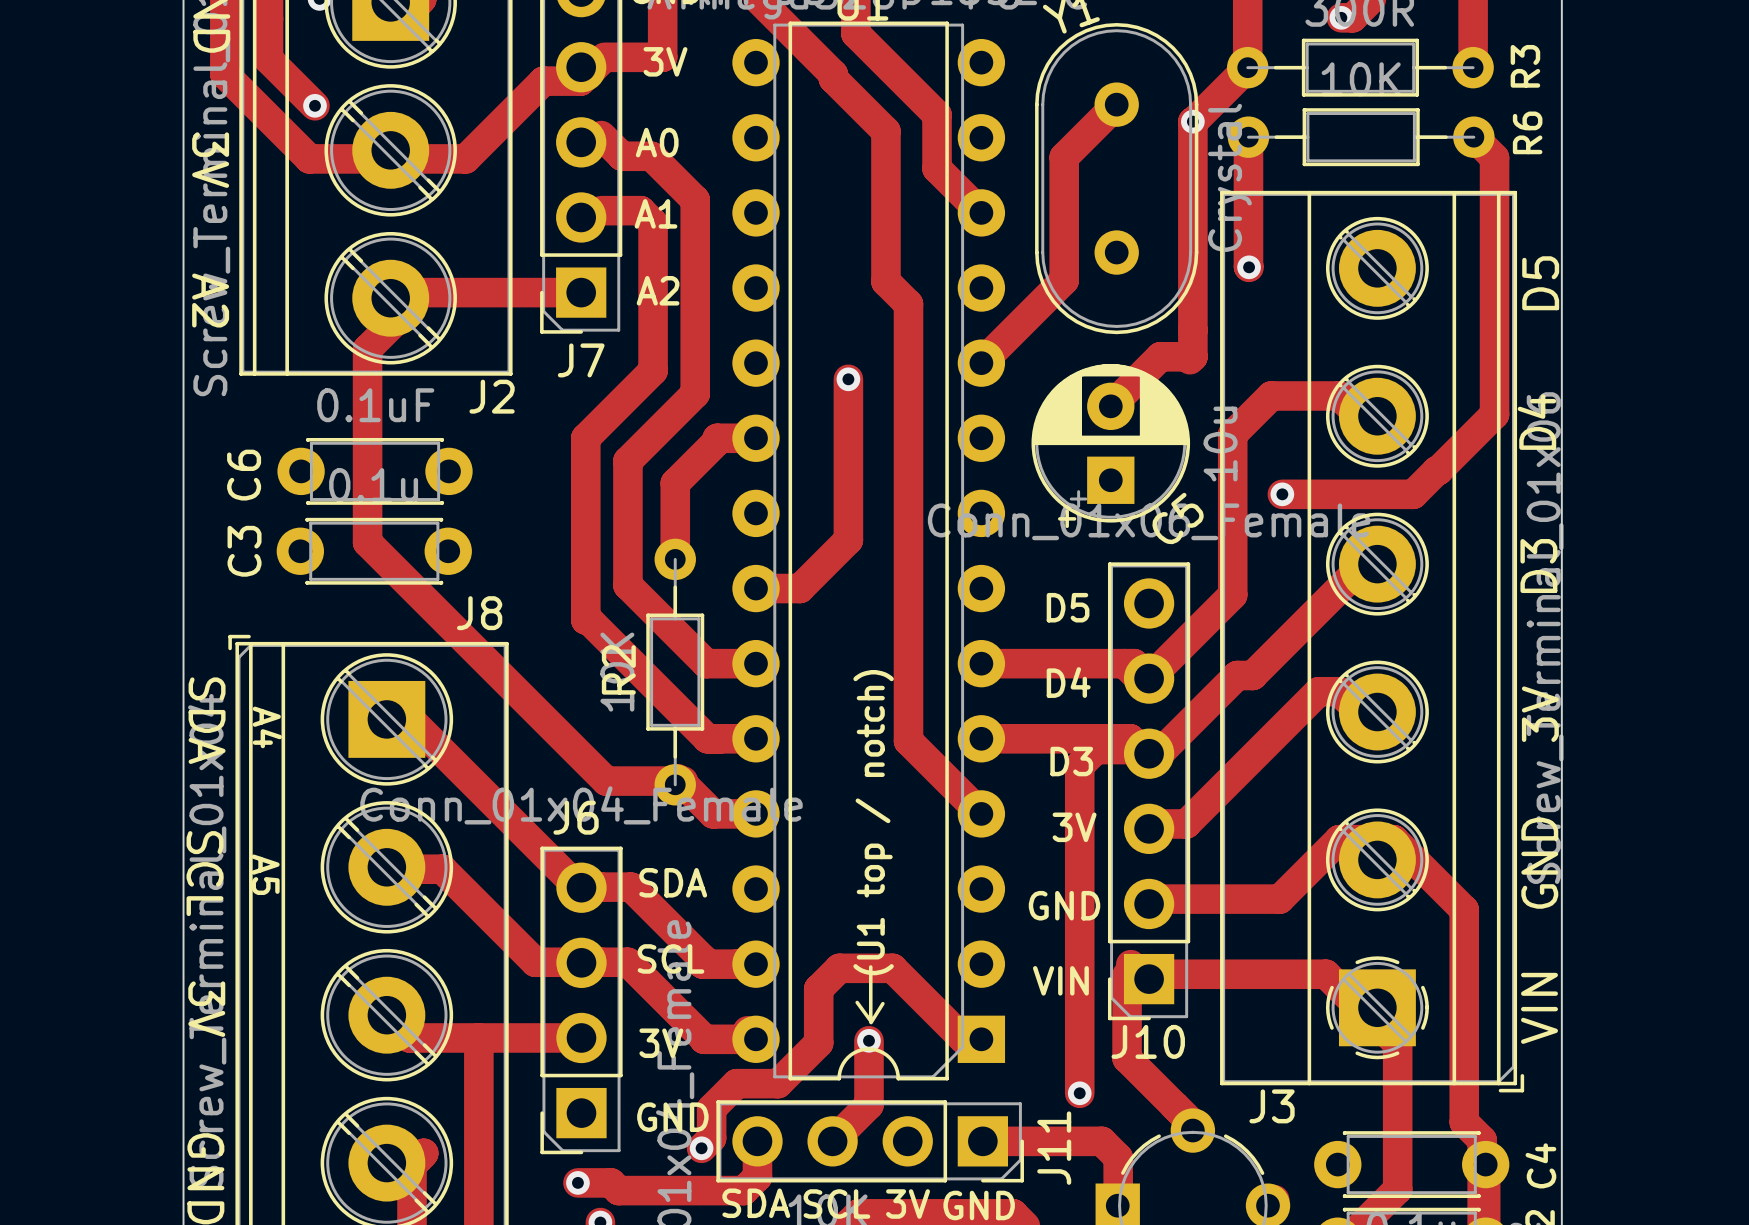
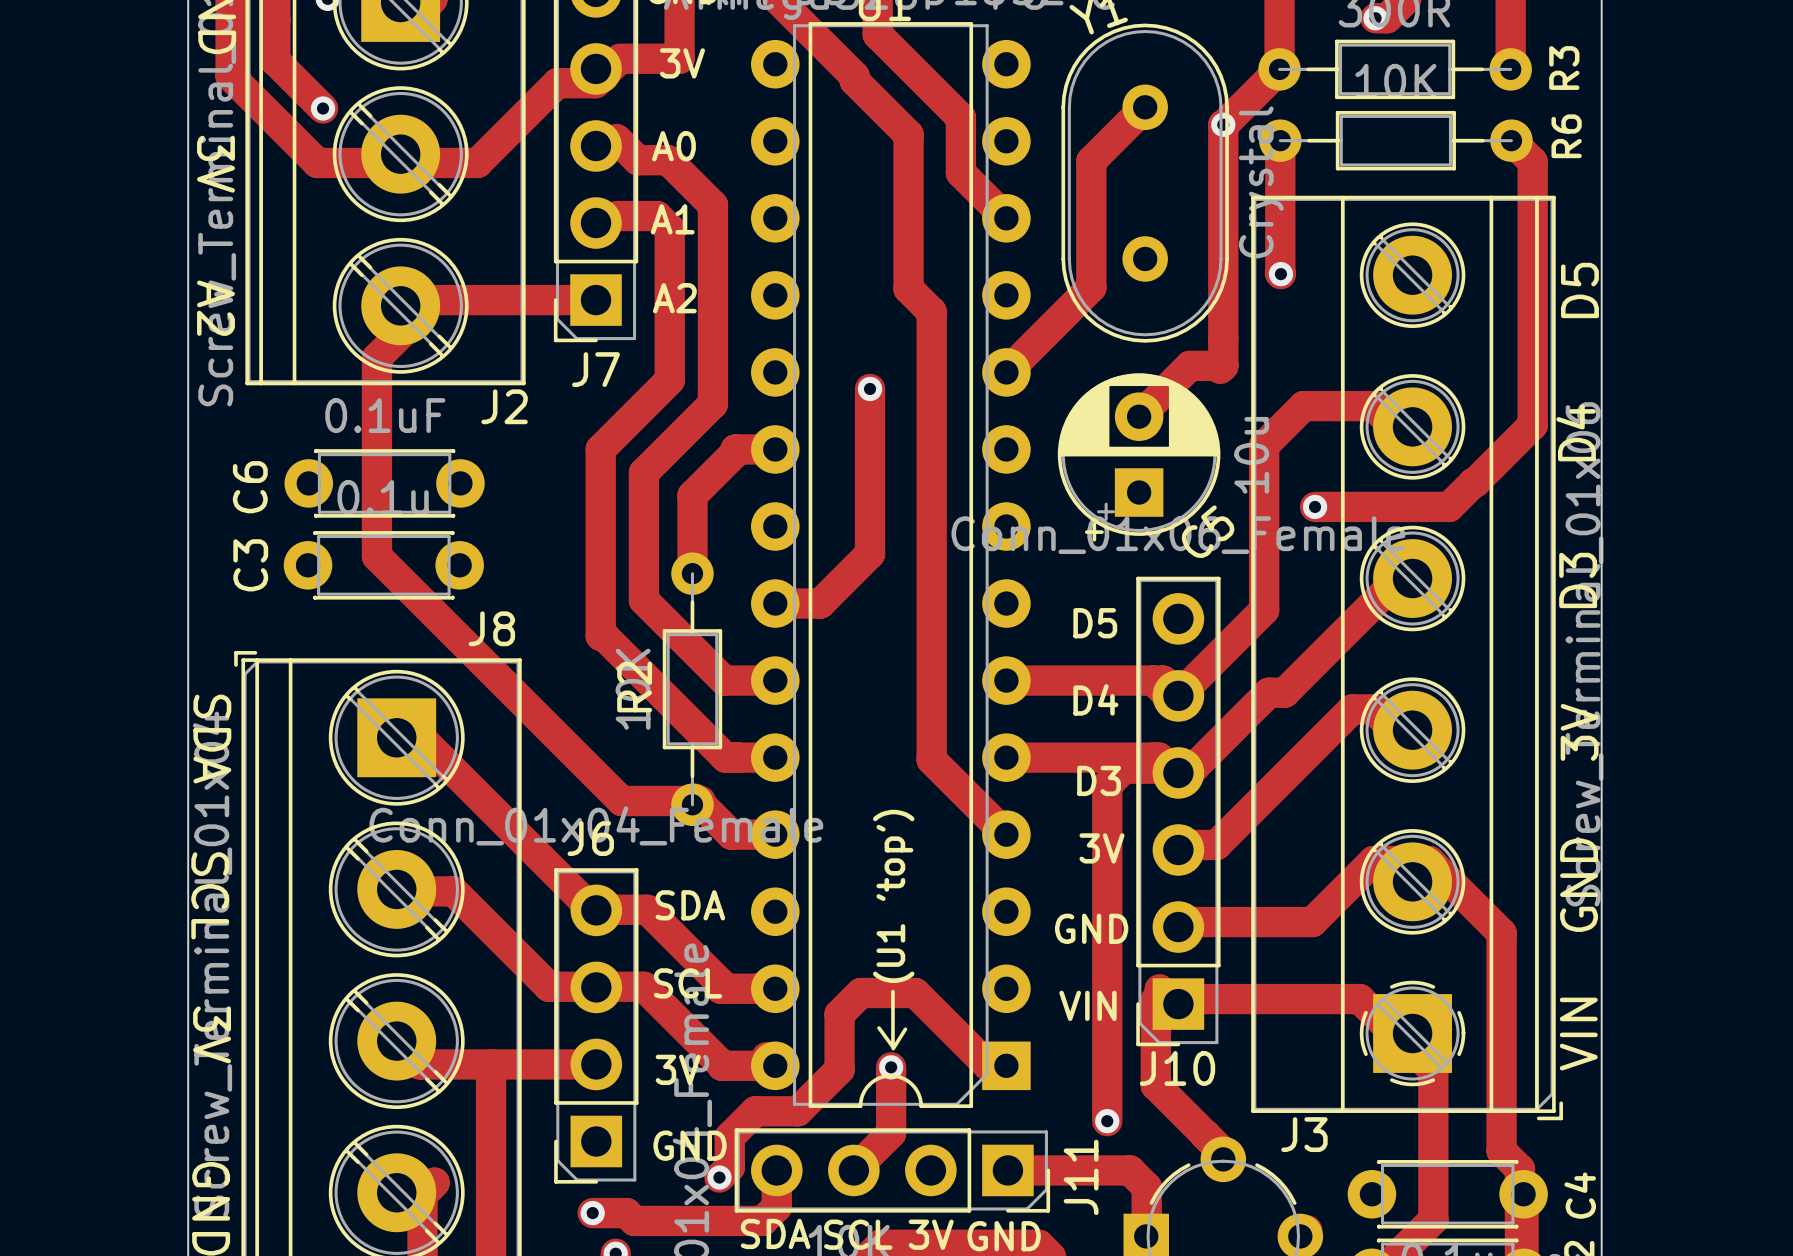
text: A4 (267, 727) -> none
text: (U1 top / notch) (873, 822) -> (U1 'top') (893, 896)
text: A5 (265, 874) -> none

